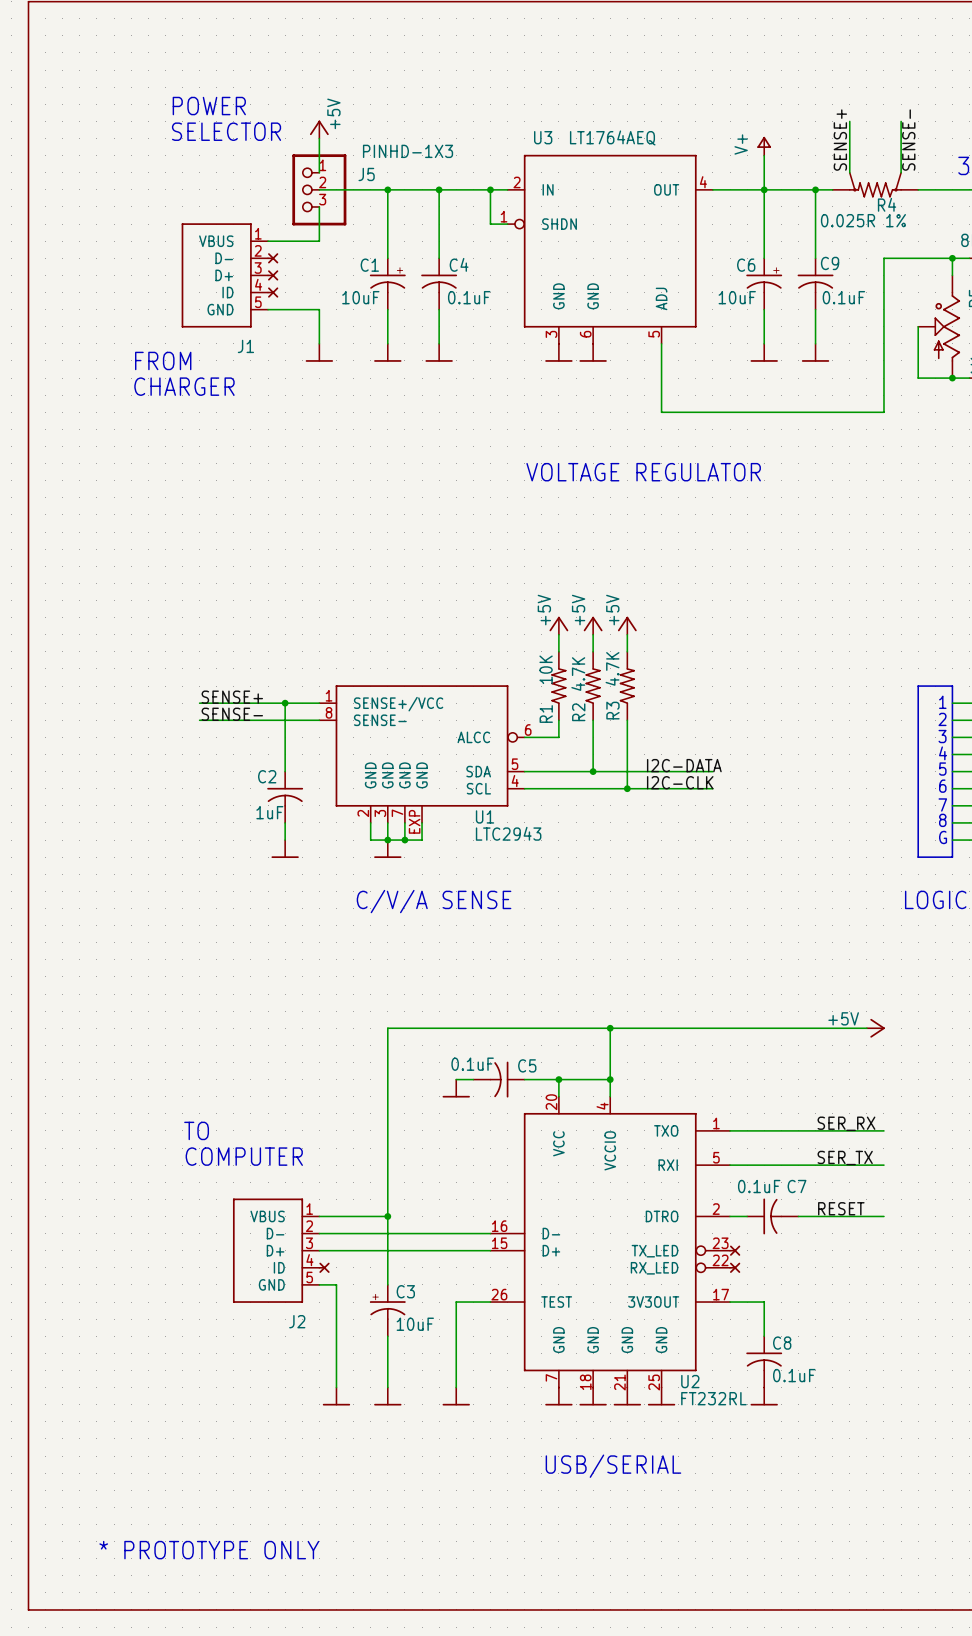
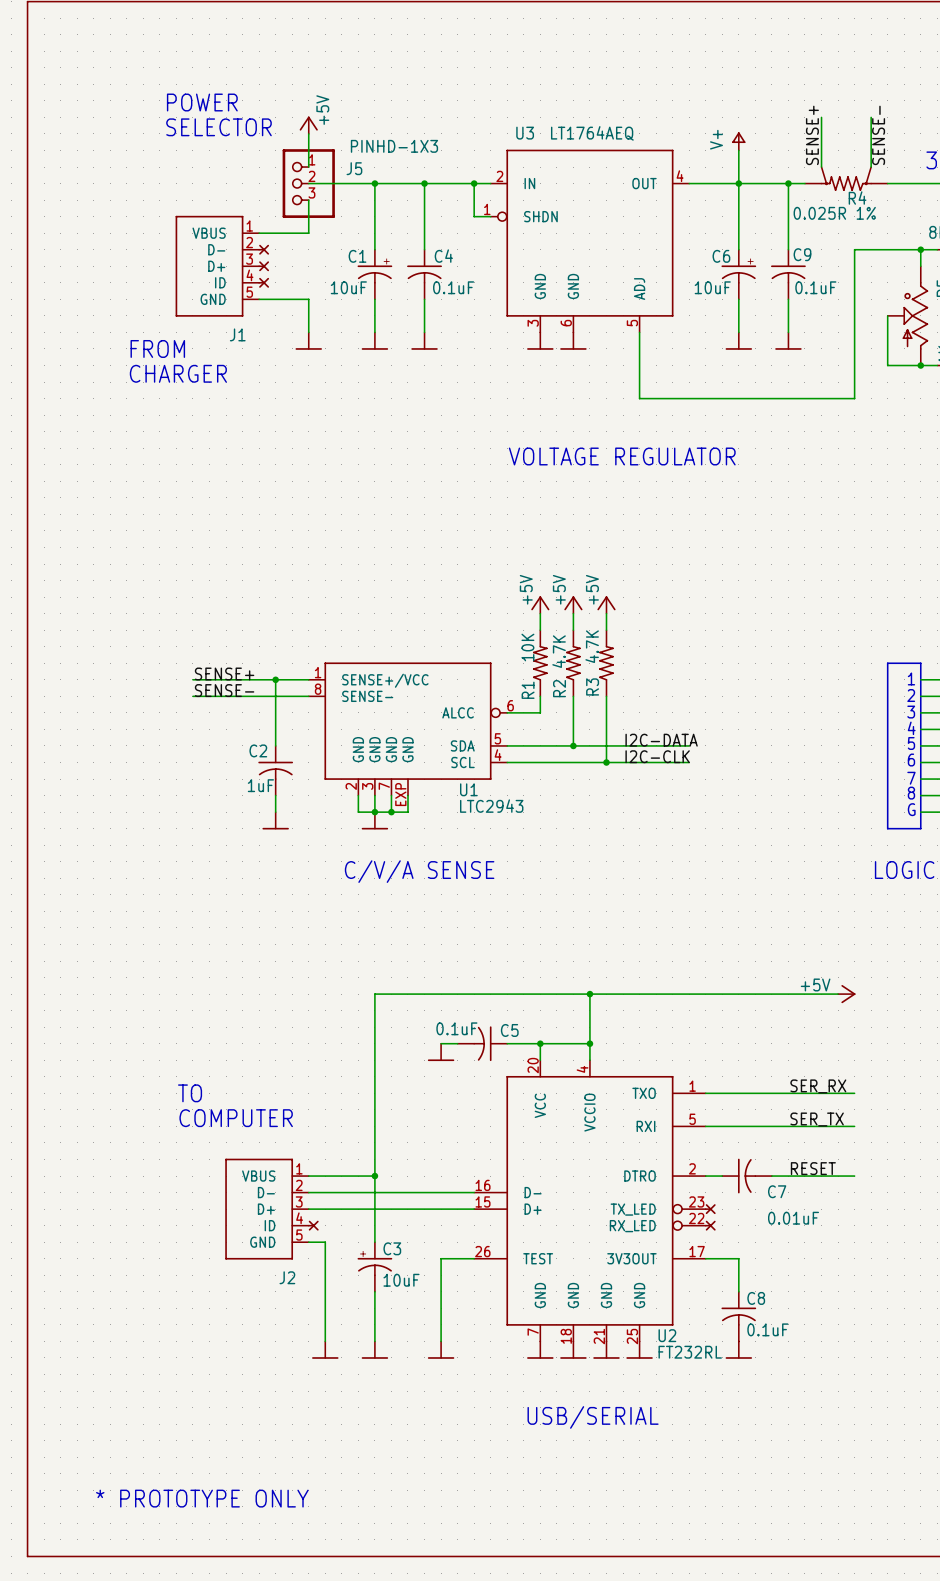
C7 value: 0.1uF (759, 1186) -> 0.01uF (793, 1218)
C7 name position: C7 (797, 1186) -> C7 (777, 1191)

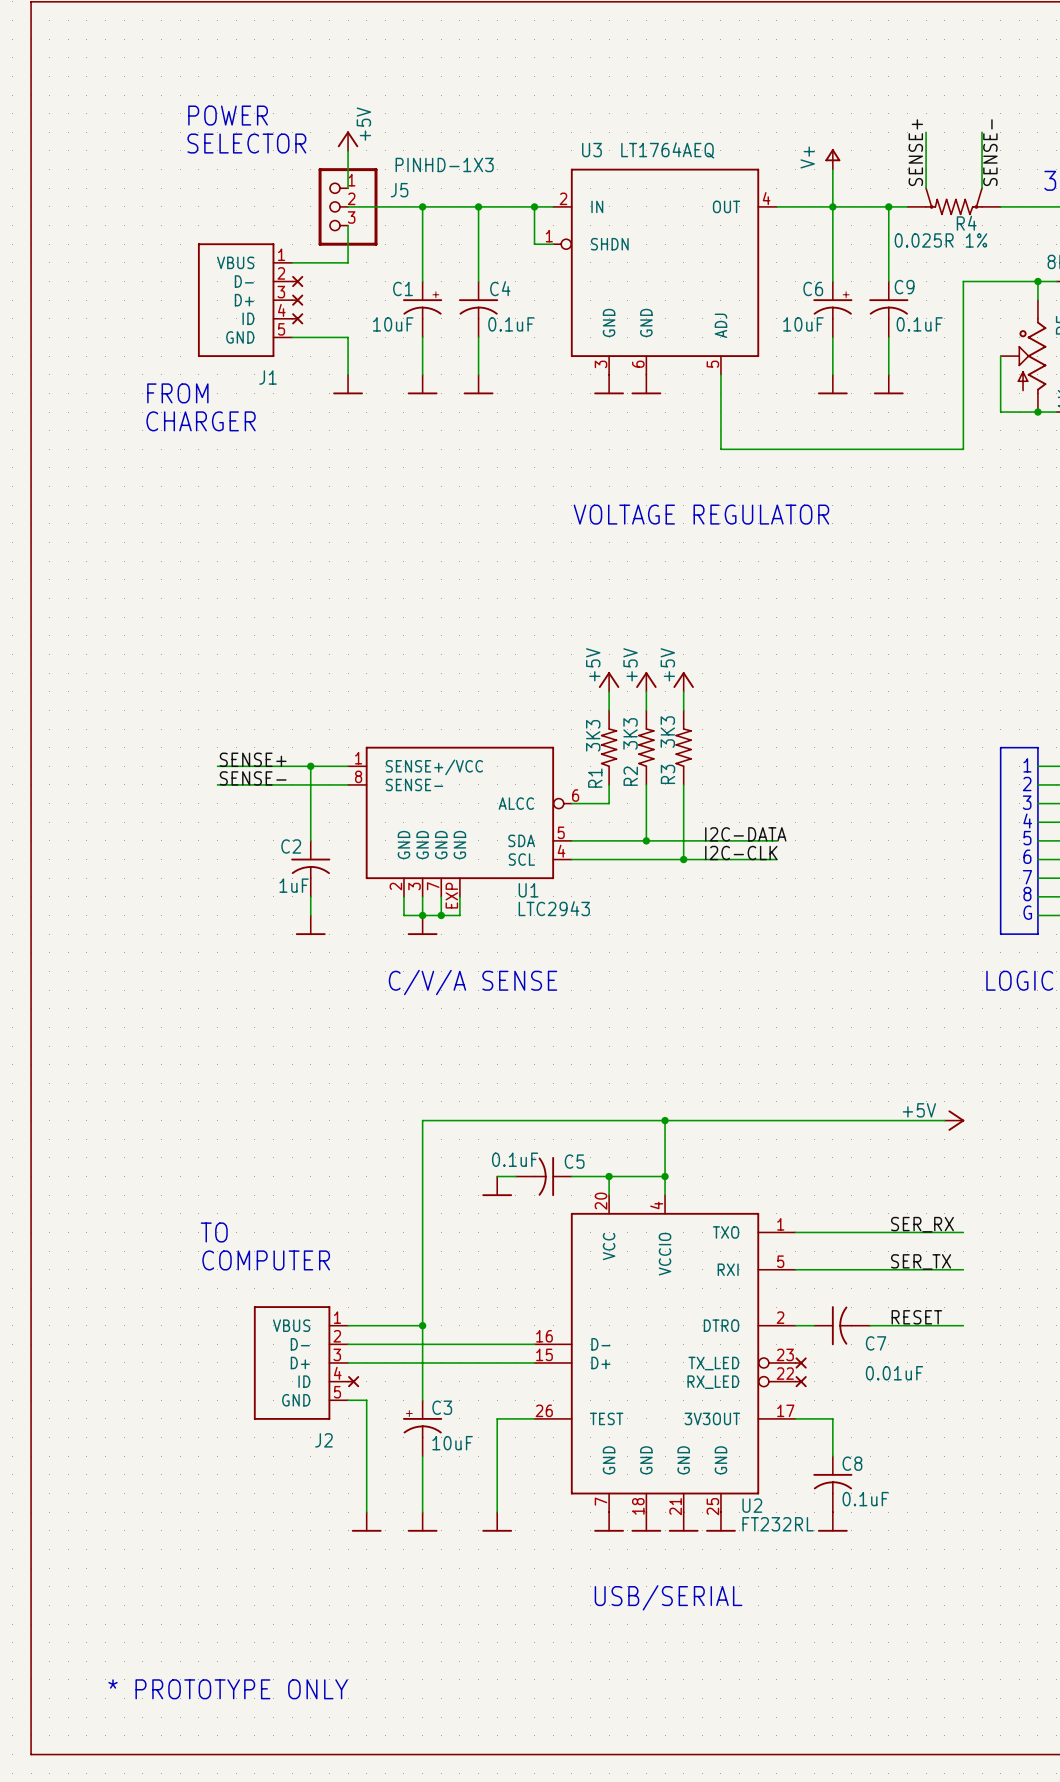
R3 value: 4.7K (592, 646) -> 3K3 (667, 732)
R1 value: 10K (527, 647) -> 3K3 (593, 735)
R2 value: 4.7K (559, 651) -> 3K3 (630, 733)

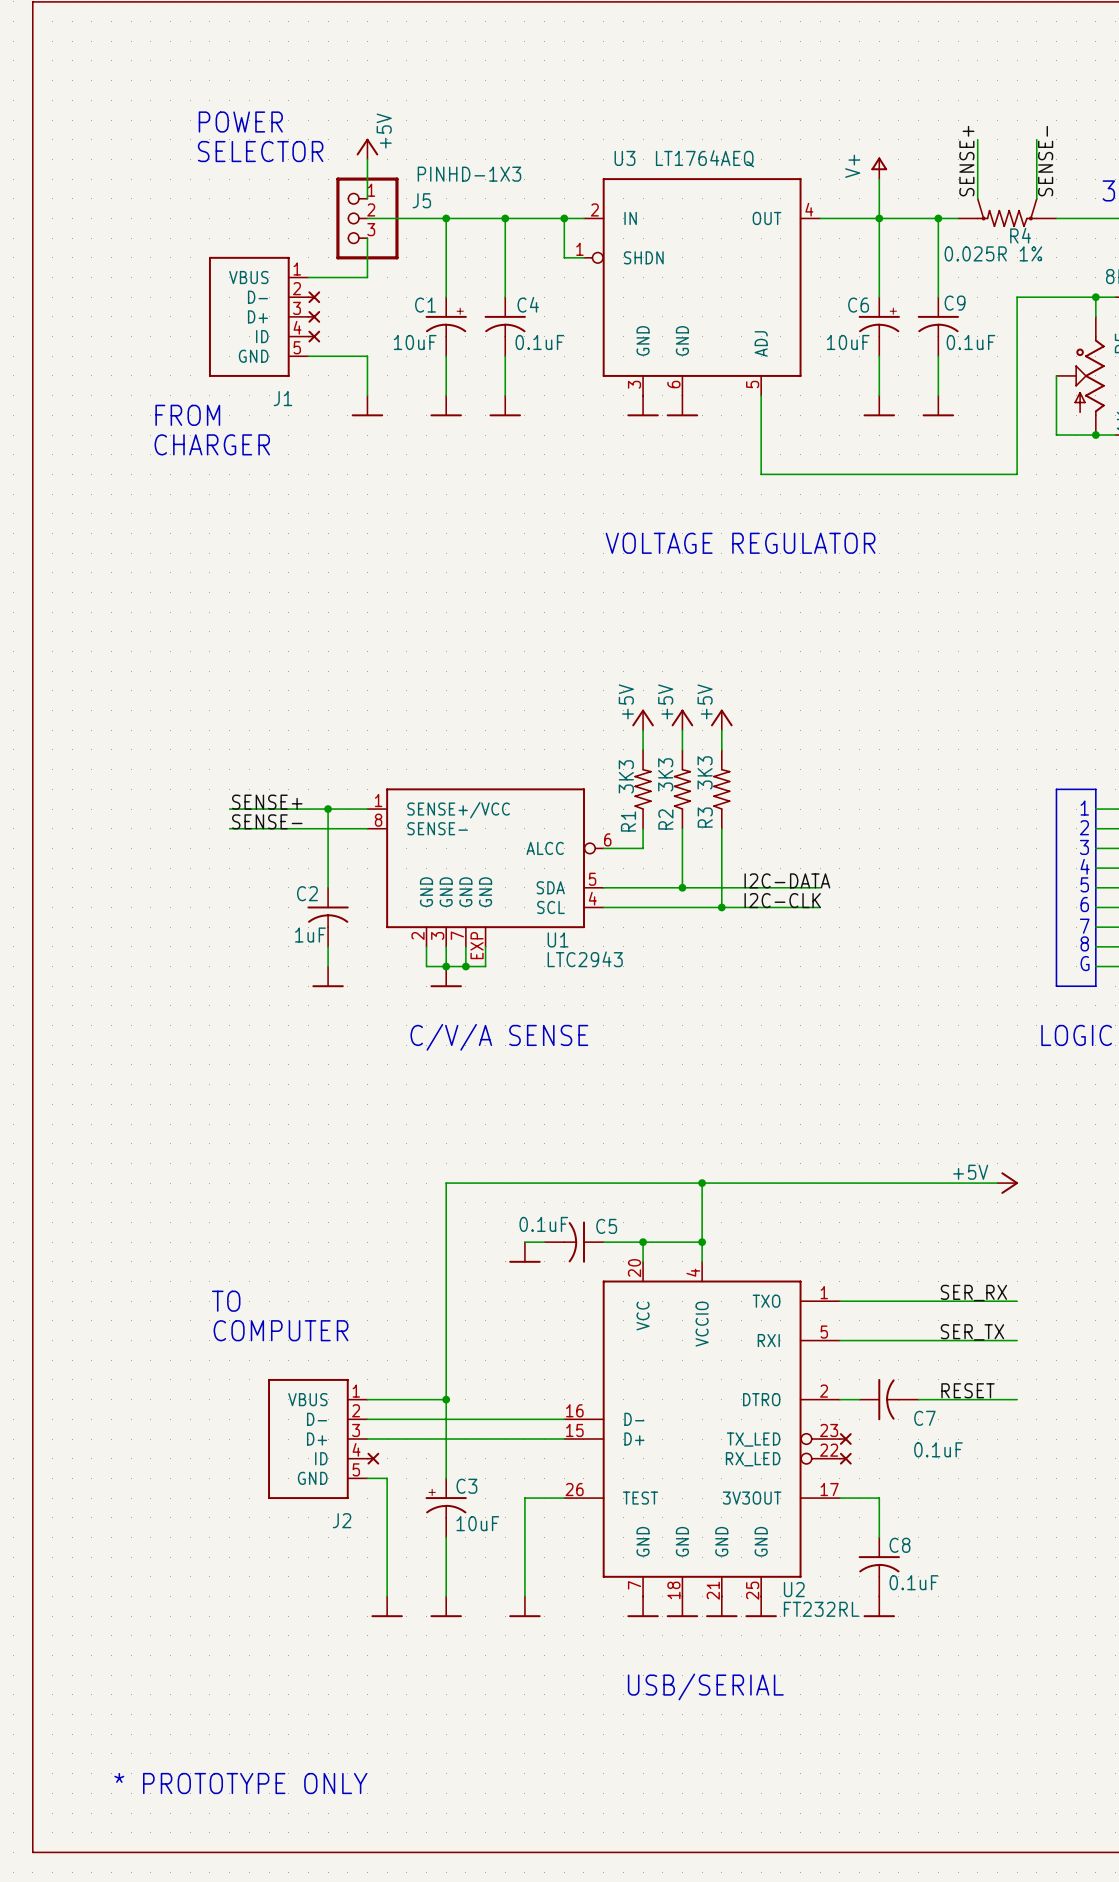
C7 value: 0.01uF (894, 1373) -> 0.1uF (938, 1449)

